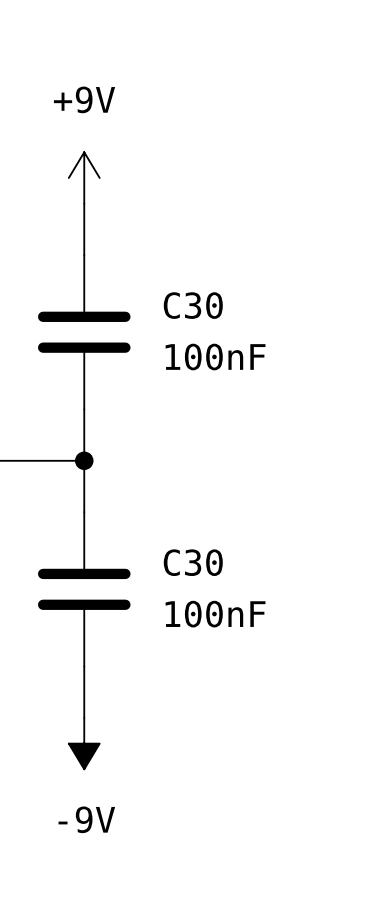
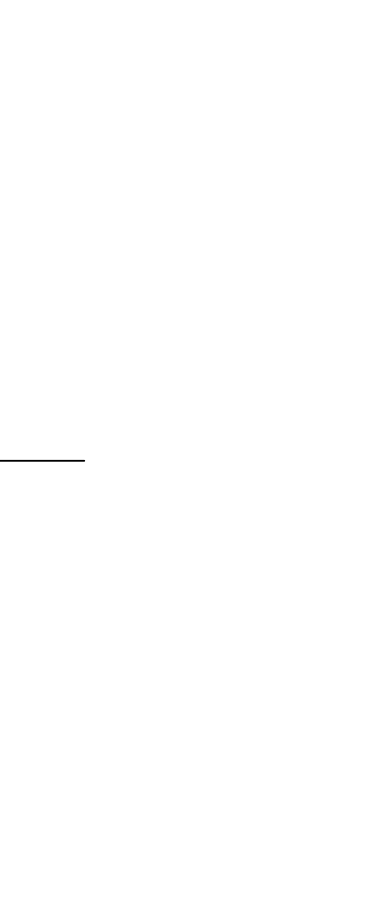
power symbol: +9V (84, 177) -> none
wire: (84, 203) (84, 255) -> none
C30: 100nF (84, 332) -> none
wire: (84, 409) (84, 512) -> none
junction: (84, 460) -> none
C30: 100nF (84, 589) -> none
wire: (84, 666) (84, 717) -> none
power symbol: -9V (84, 743) -> none

